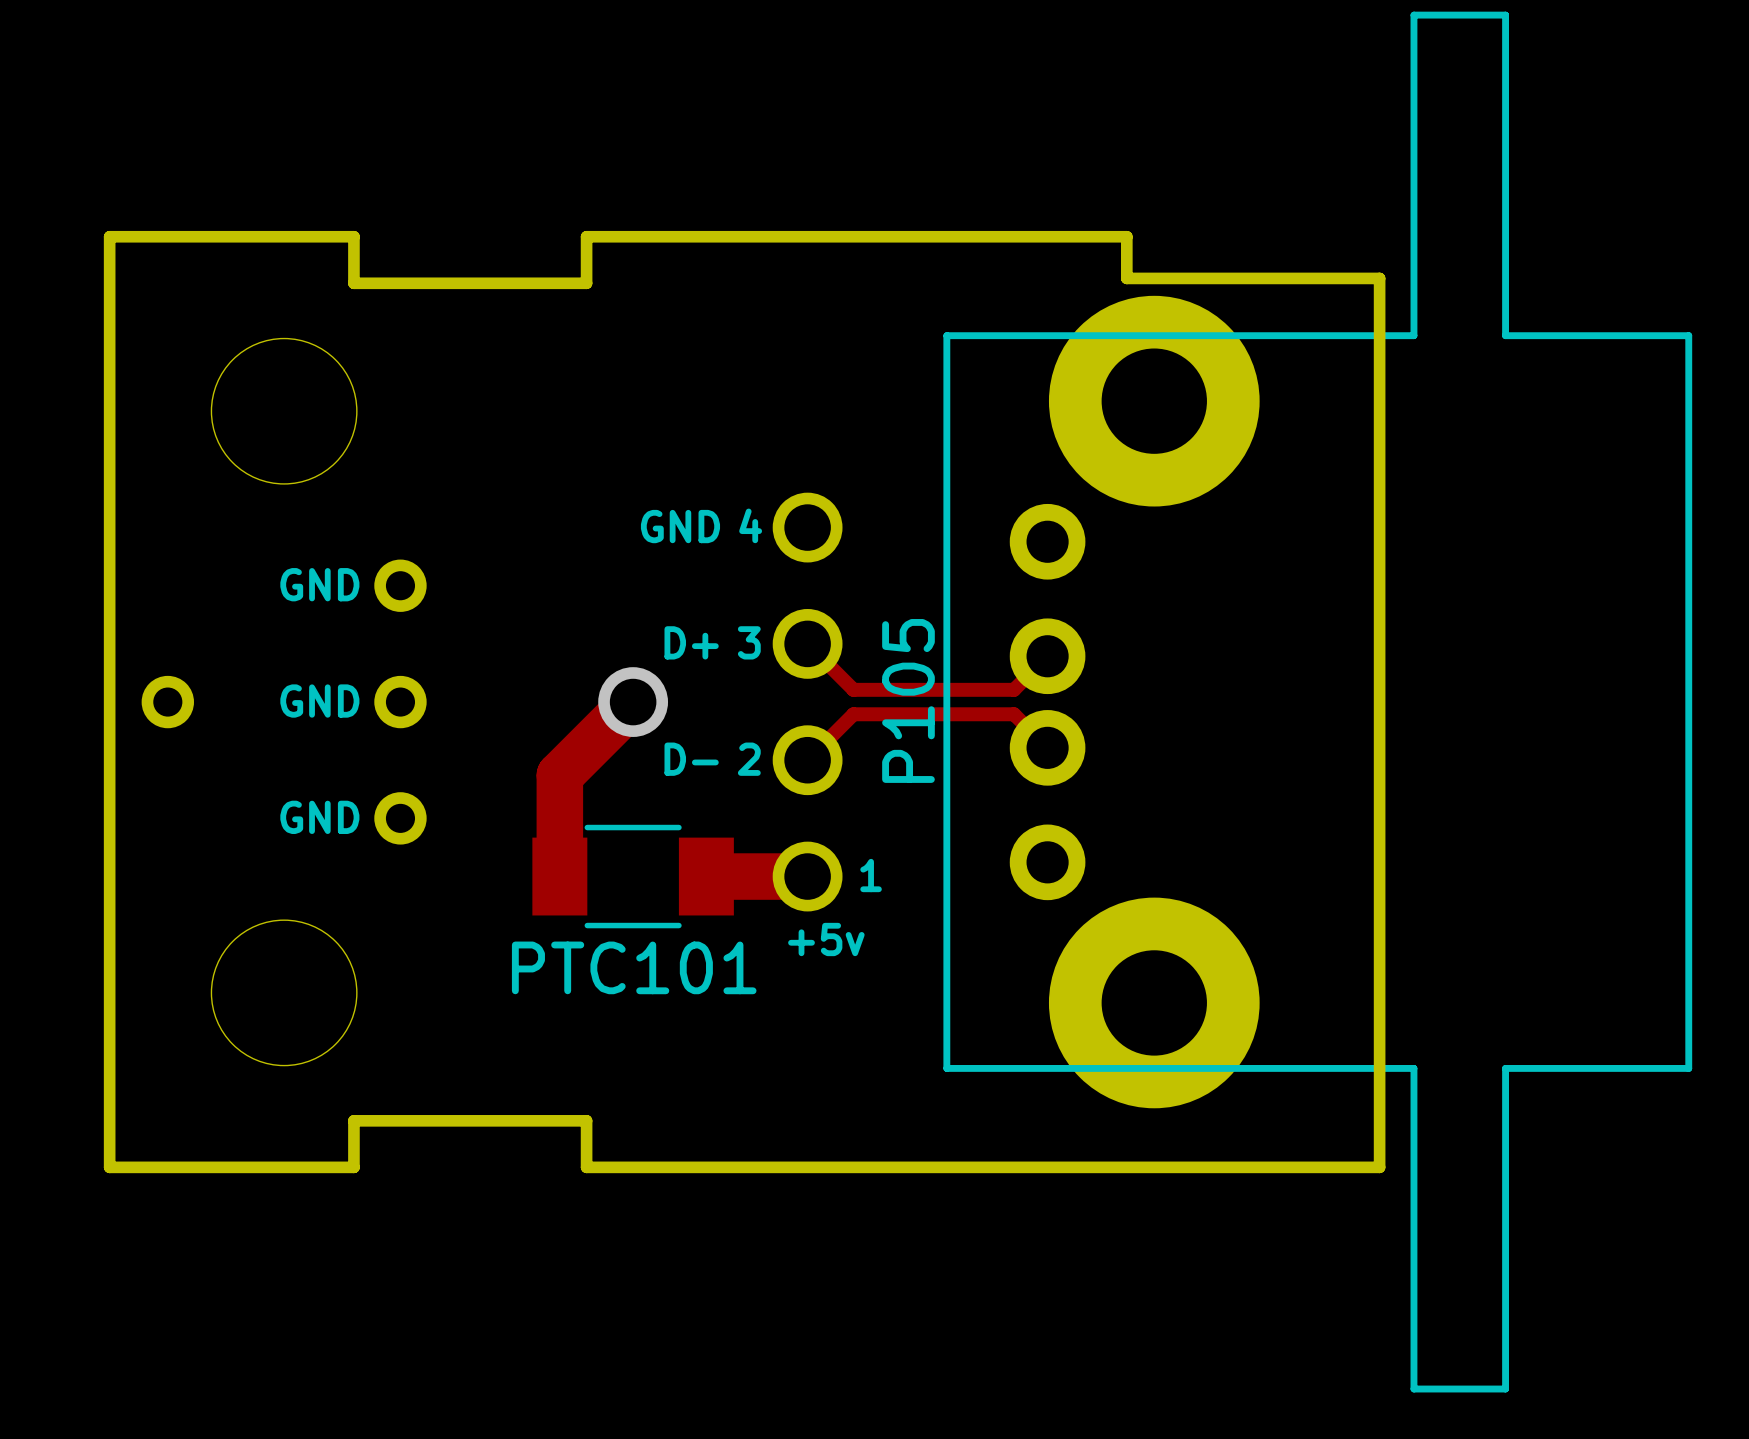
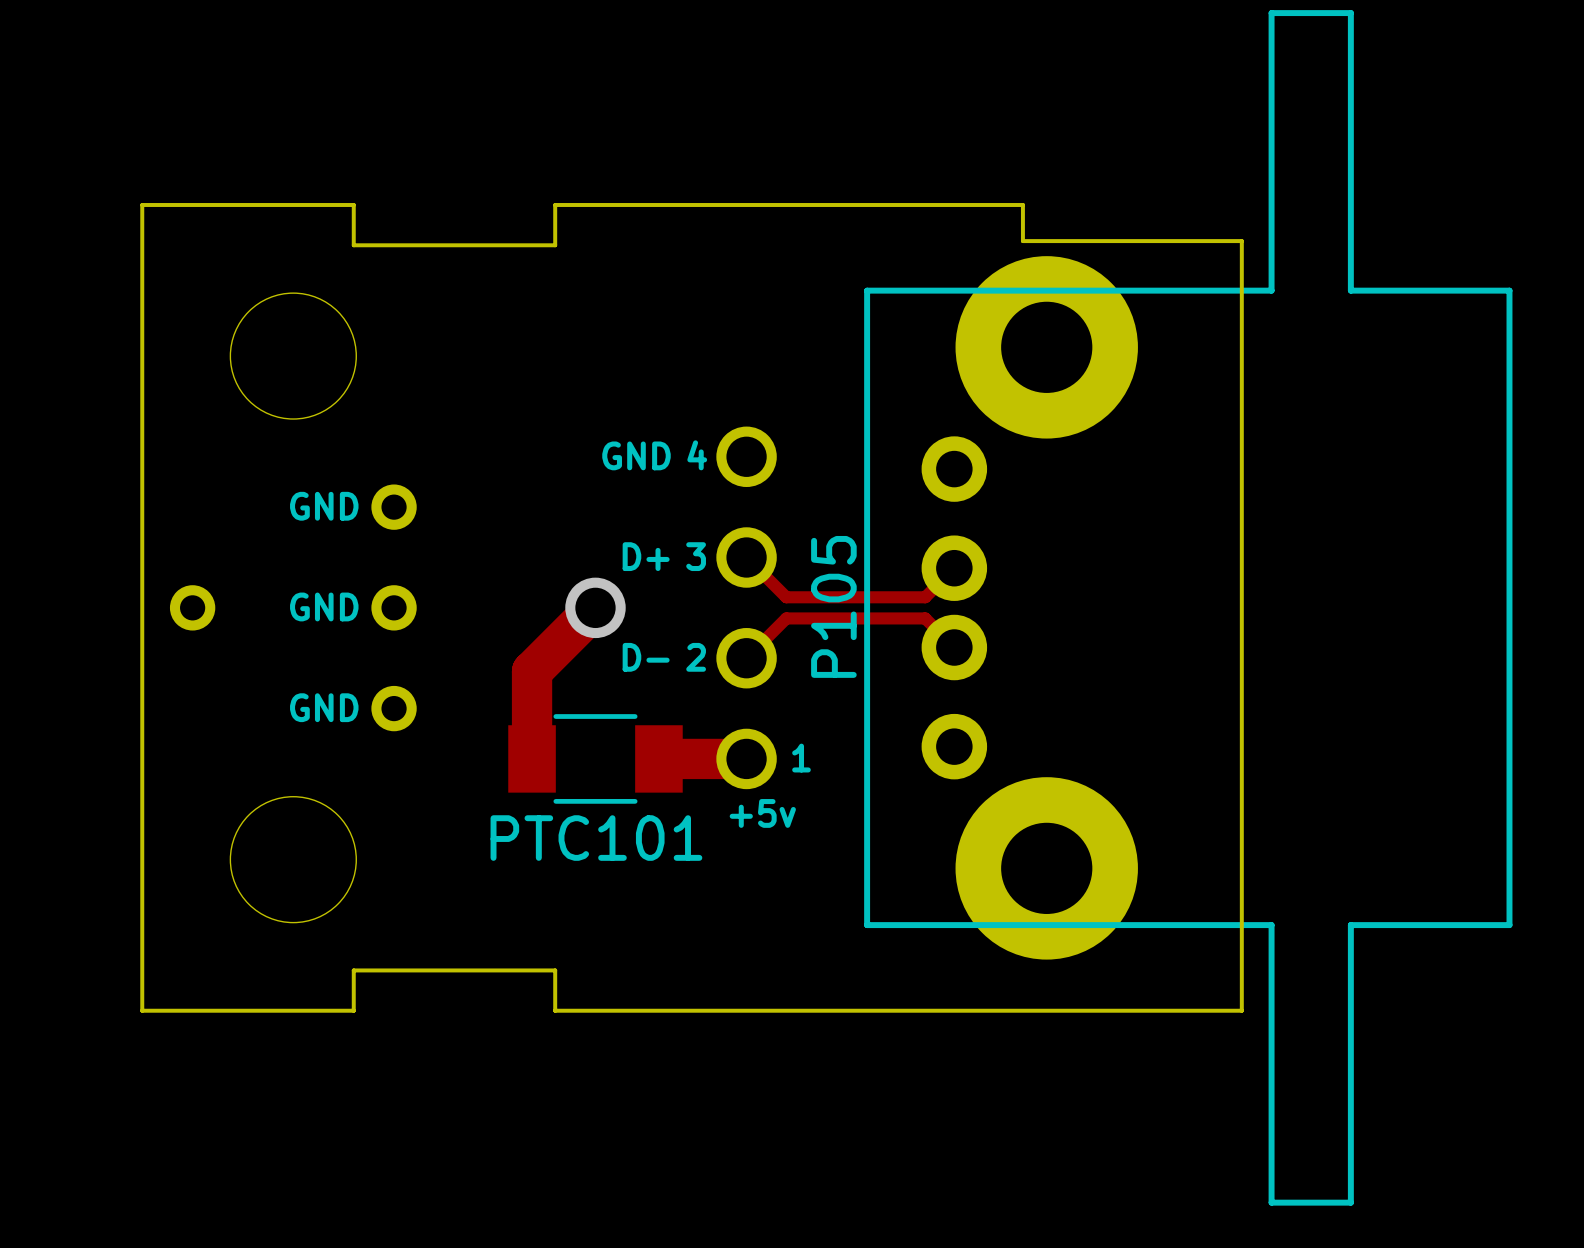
board edge width: thick (109, 236) (353, 236) (353, 283) (586, 283) (586, 236) (1126, 236) (1126, 278) (1379, 278) (1379, 1167) (586, 1167) (586, 1120) (353, 1120) (353, 1167) (109, 1167) (109, 236) -> thin (142, 204) (353, 204) (353, 245) (555, 245) (555, 204) (1022, 204) (1022, 241) (1241, 241) (1241, 1010) (555, 1010) (555, 970) (353, 970) (353, 1010) (142, 1010) (142, 204)

